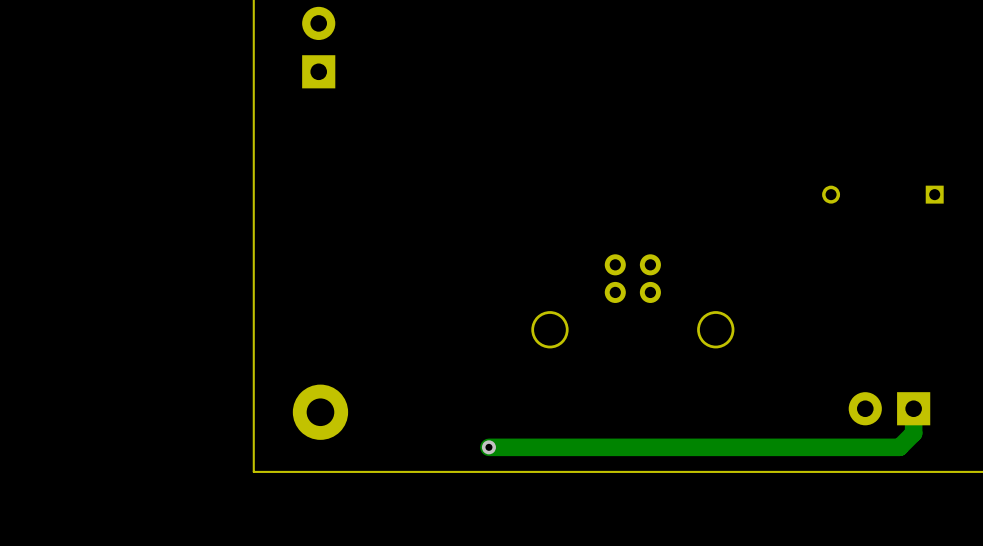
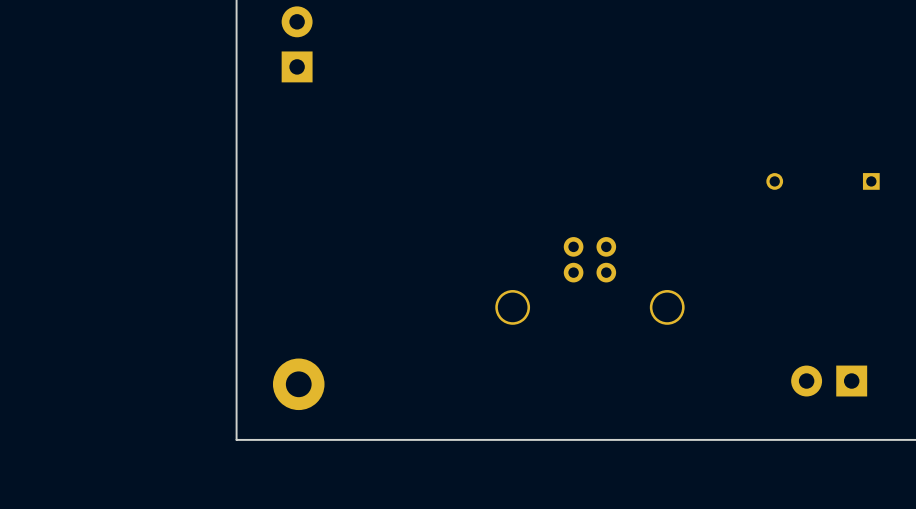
track: (913, 408) (913, 433) (899, 447) (488, 447) -> none
via: (488, 447) -> none

